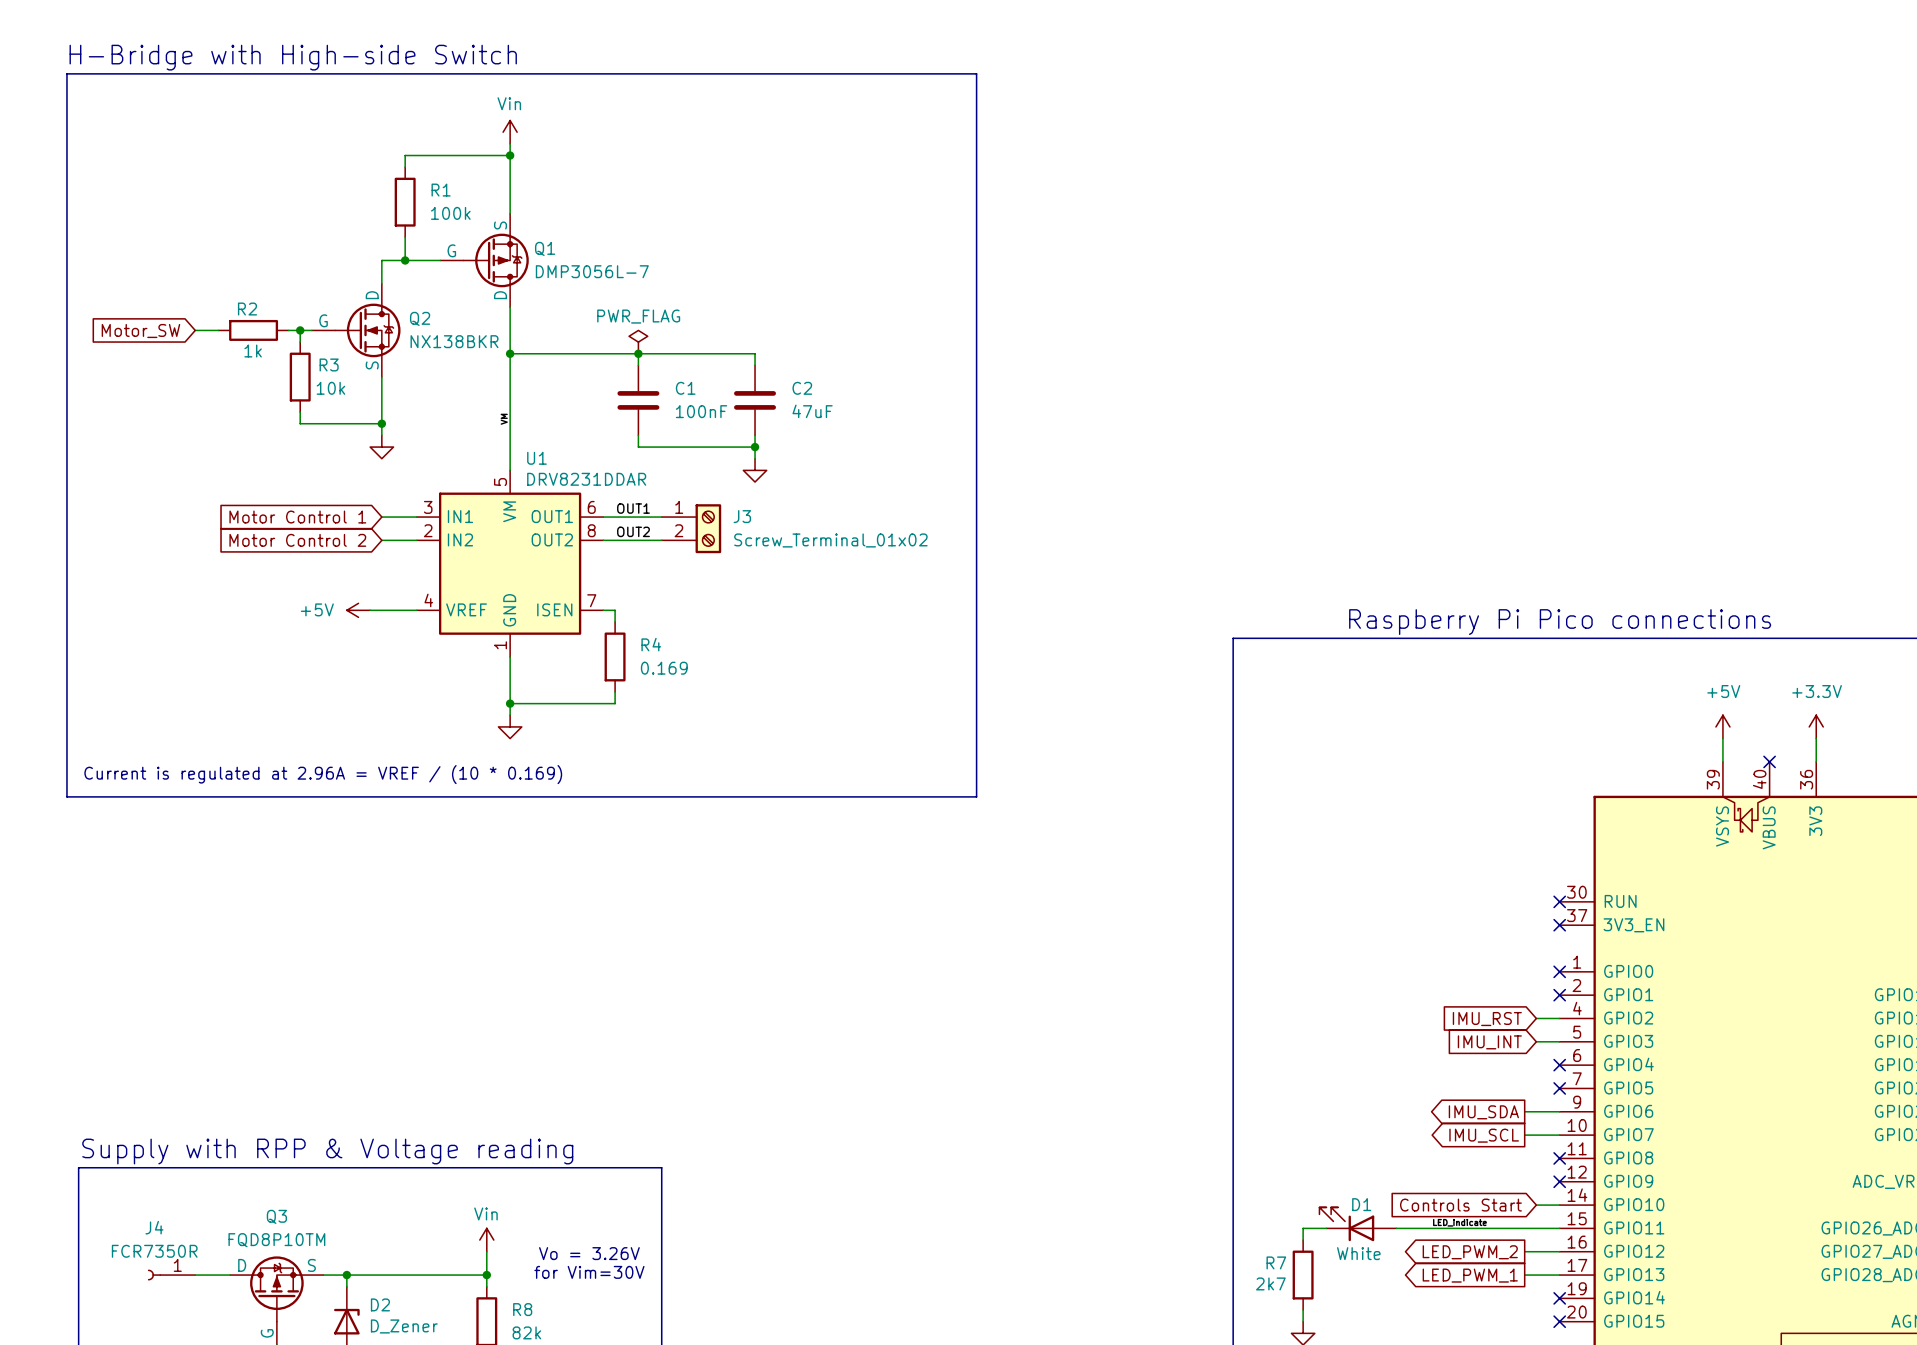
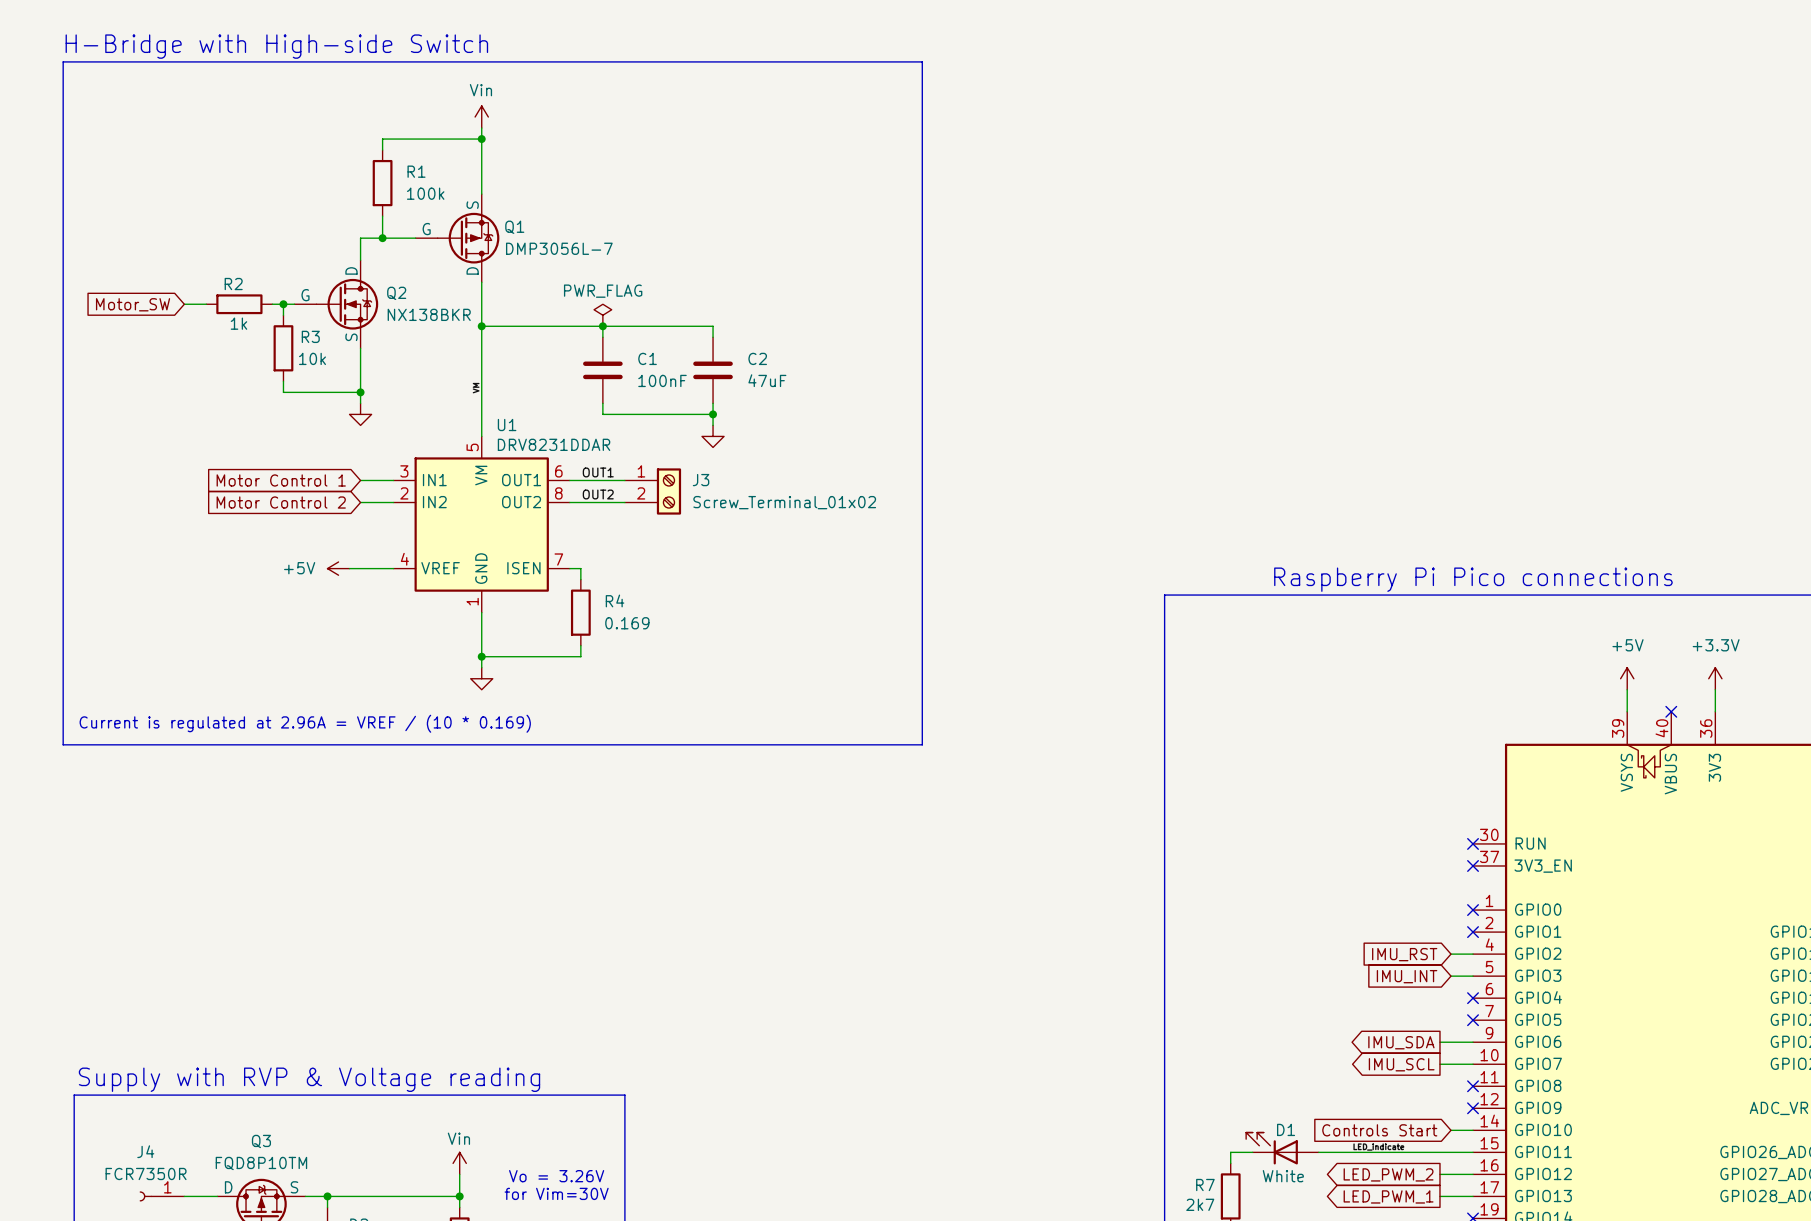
text: Supply with RPP & Voltage reading (327, 1151) -> Supply with RVP & Voltage reading (309, 1079)

